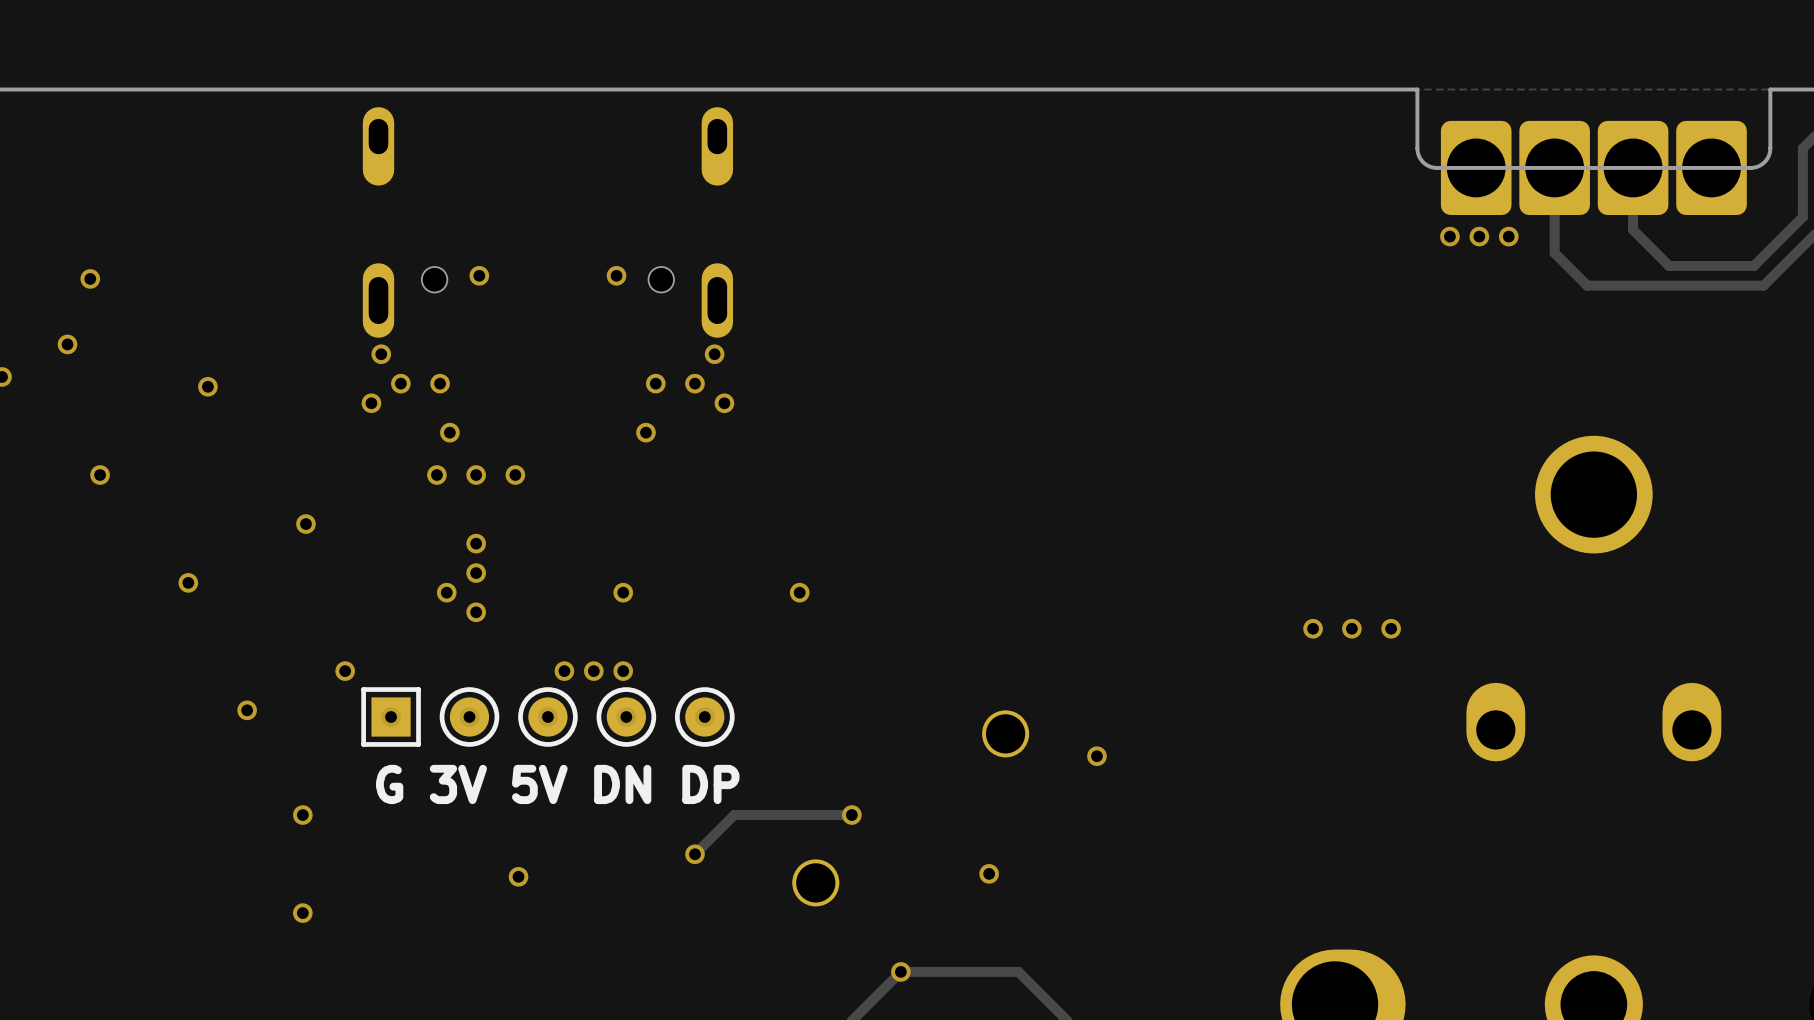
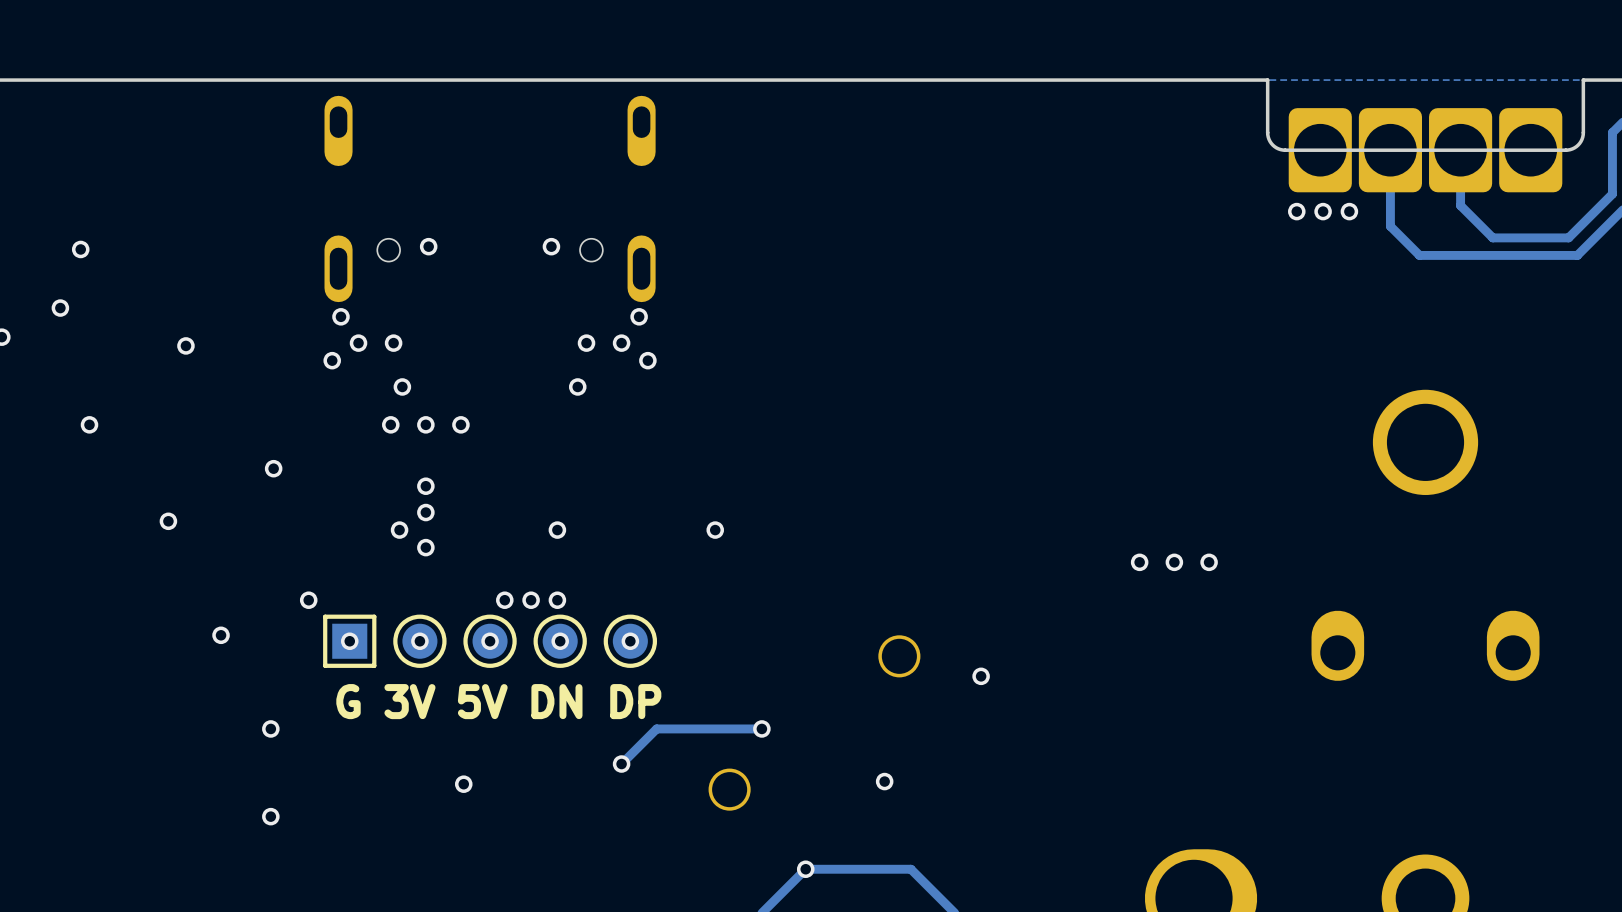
via position: (1391, 628) -> (1139, 562)

